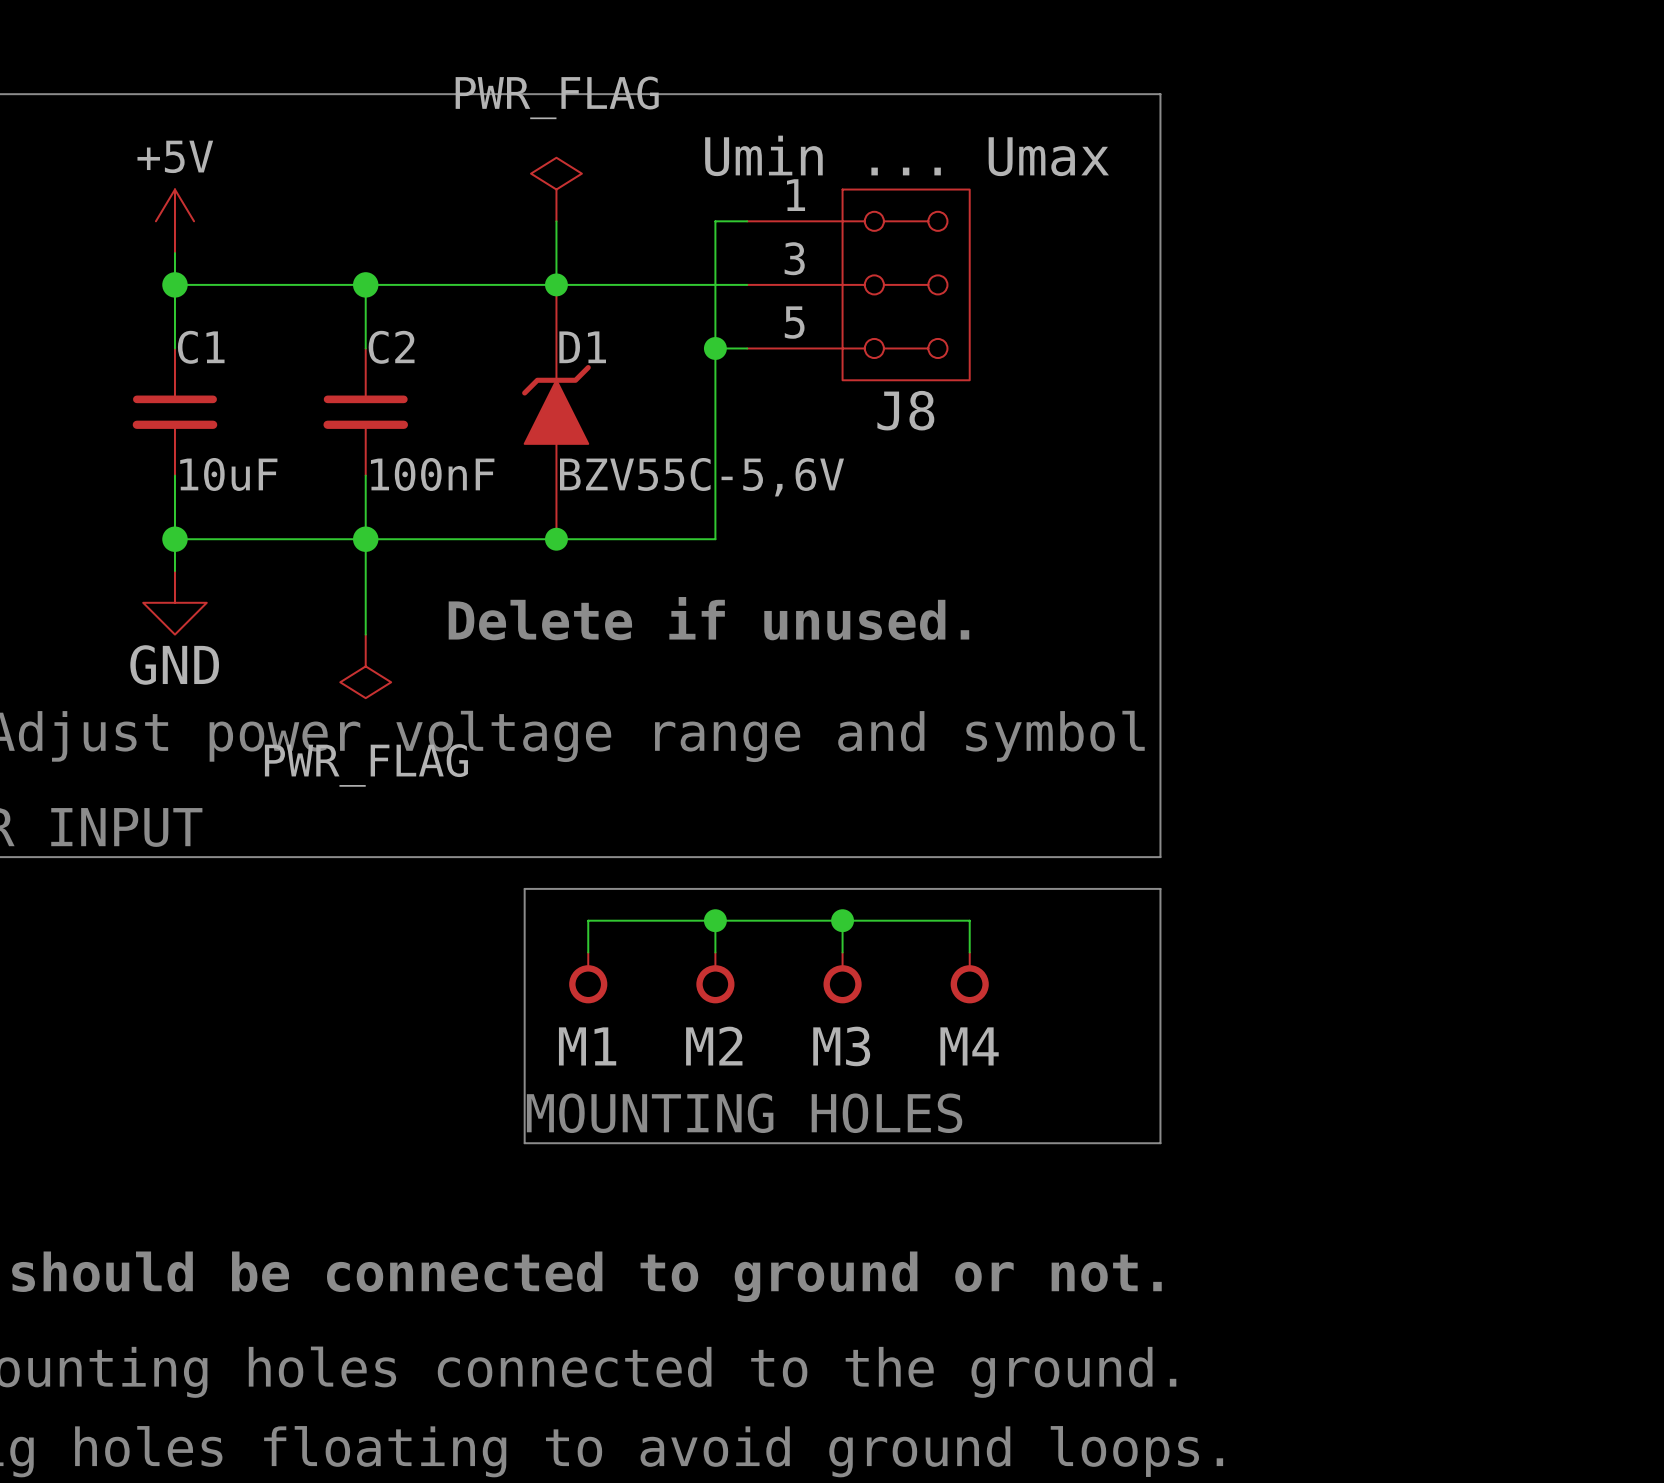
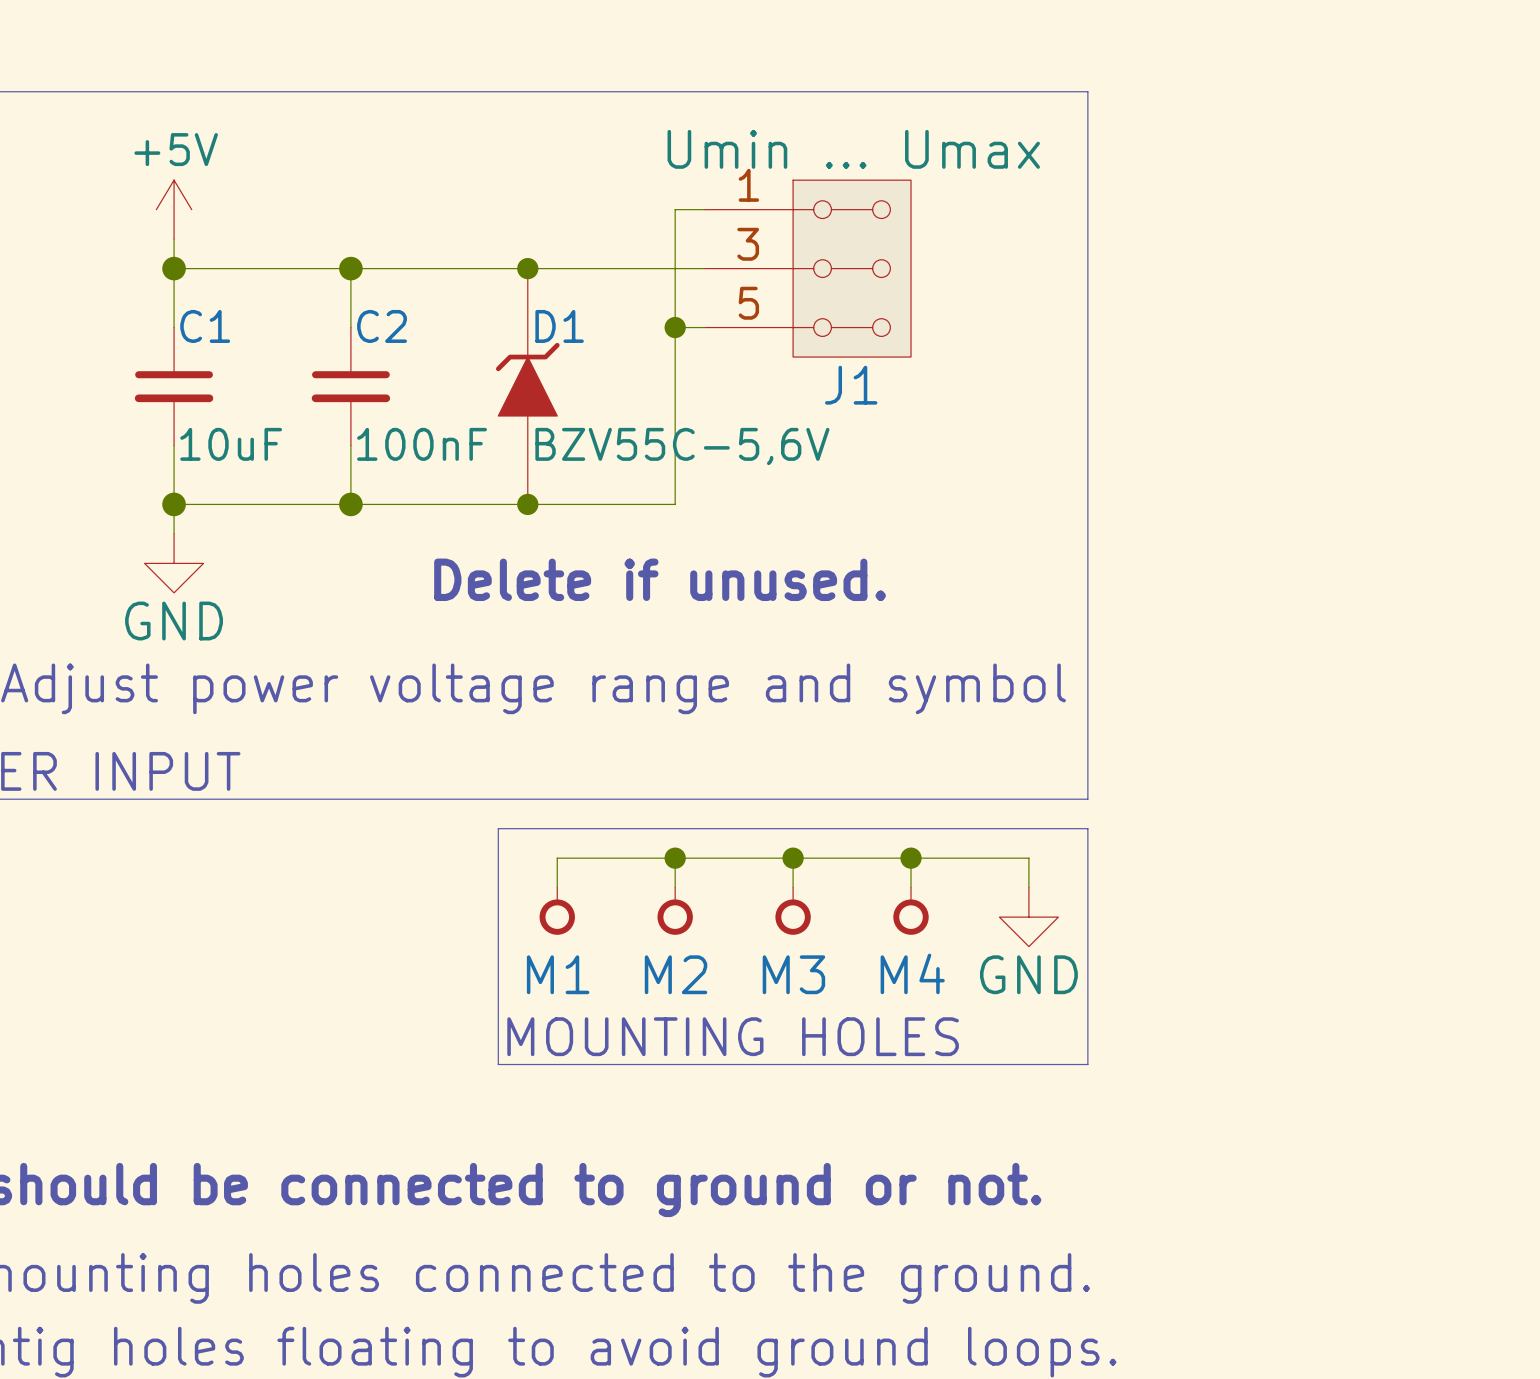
power symbol: PWR_FLAG (556, 189) -> none
wire: (556, 221) (556, 284) -> none
J8 name: J8 (905, 410) -> J1 (851, 385)
wire: (365, 539) (365, 634) -> none
power symbol: PWR_FLAG (365, 666) -> none
wire: none -> (911, 858) (1028, 858) (1028, 887)
junction: none -> (911, 858)
power symbol: none -> GND (1028, 917)

